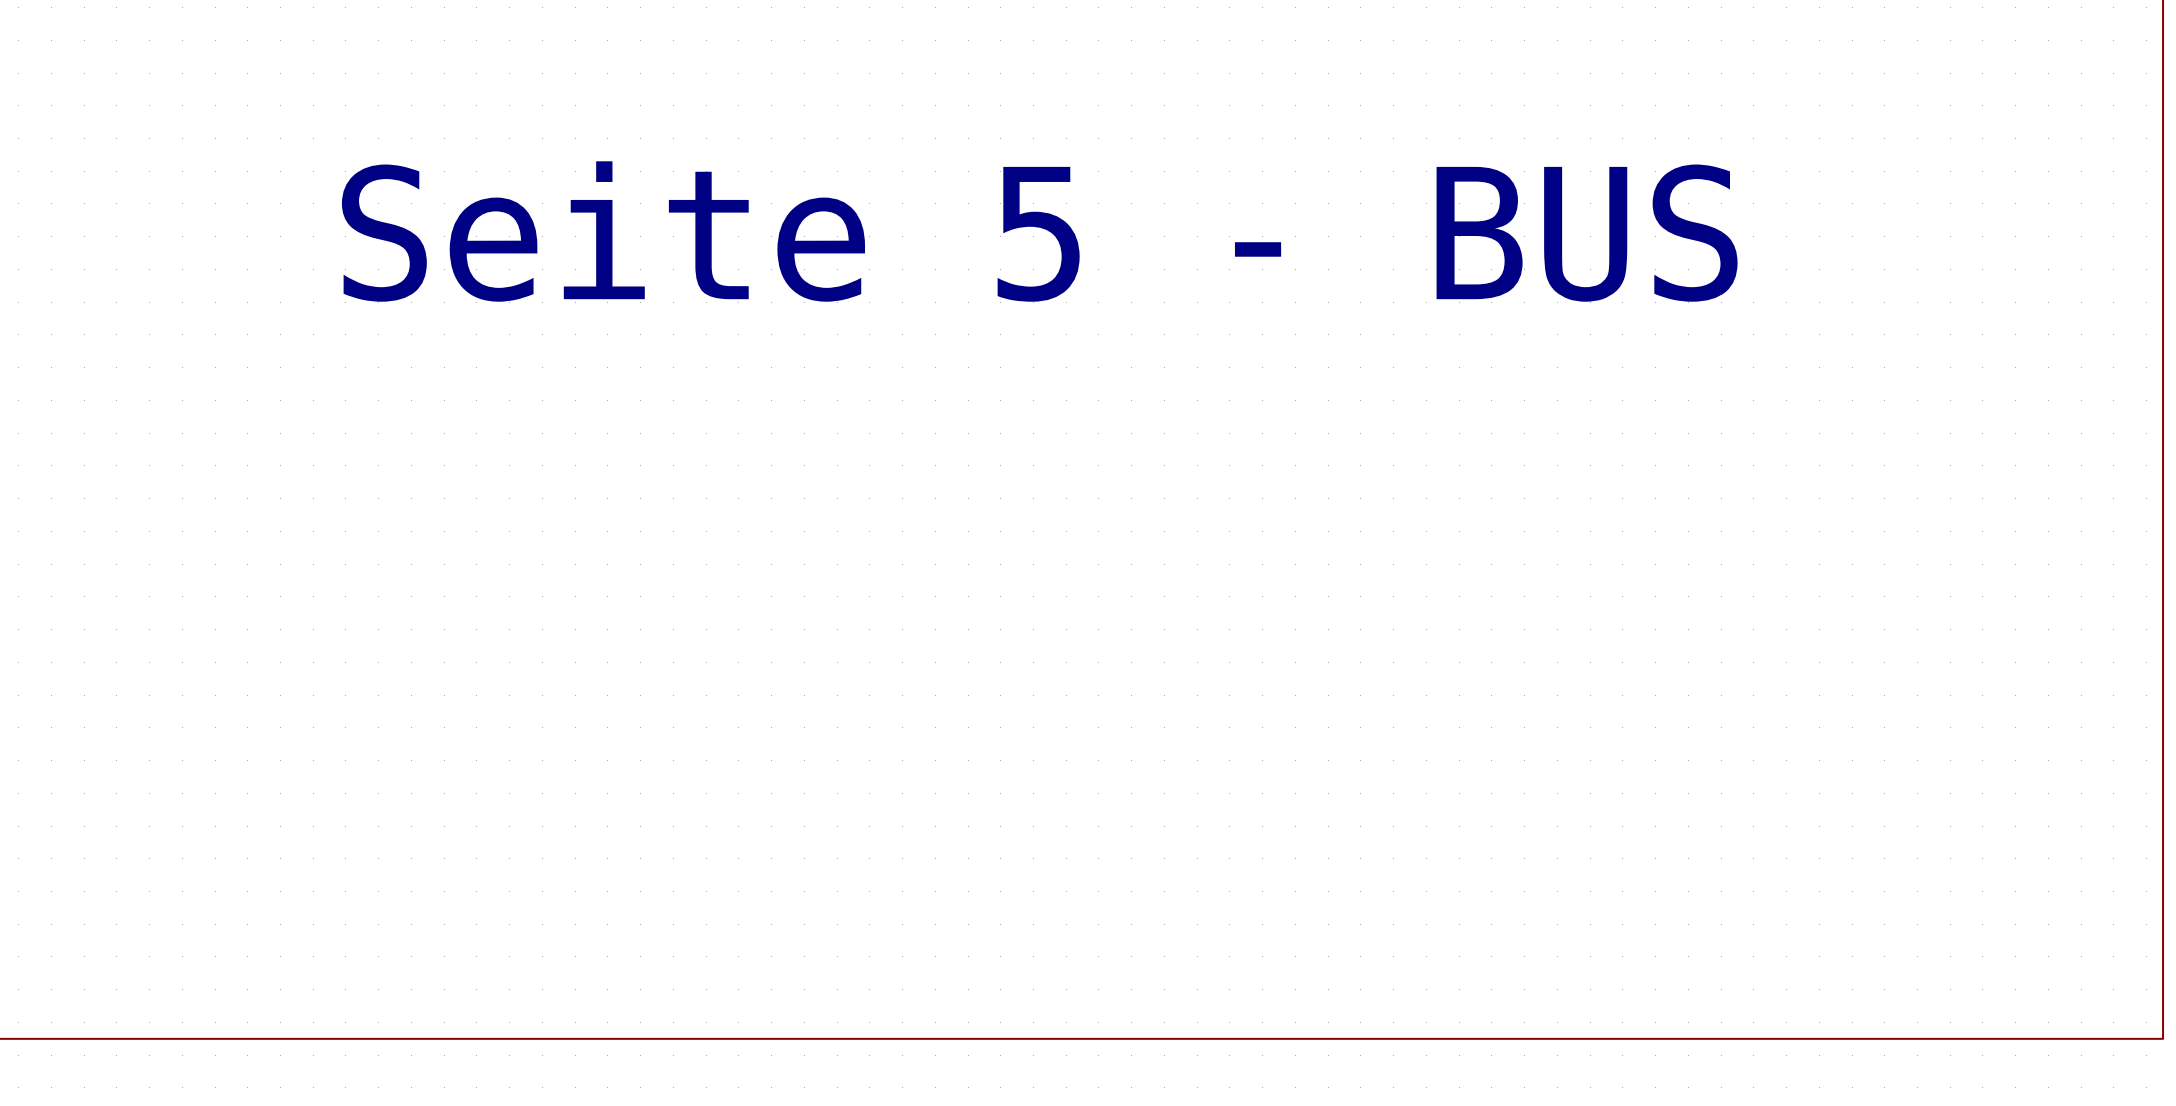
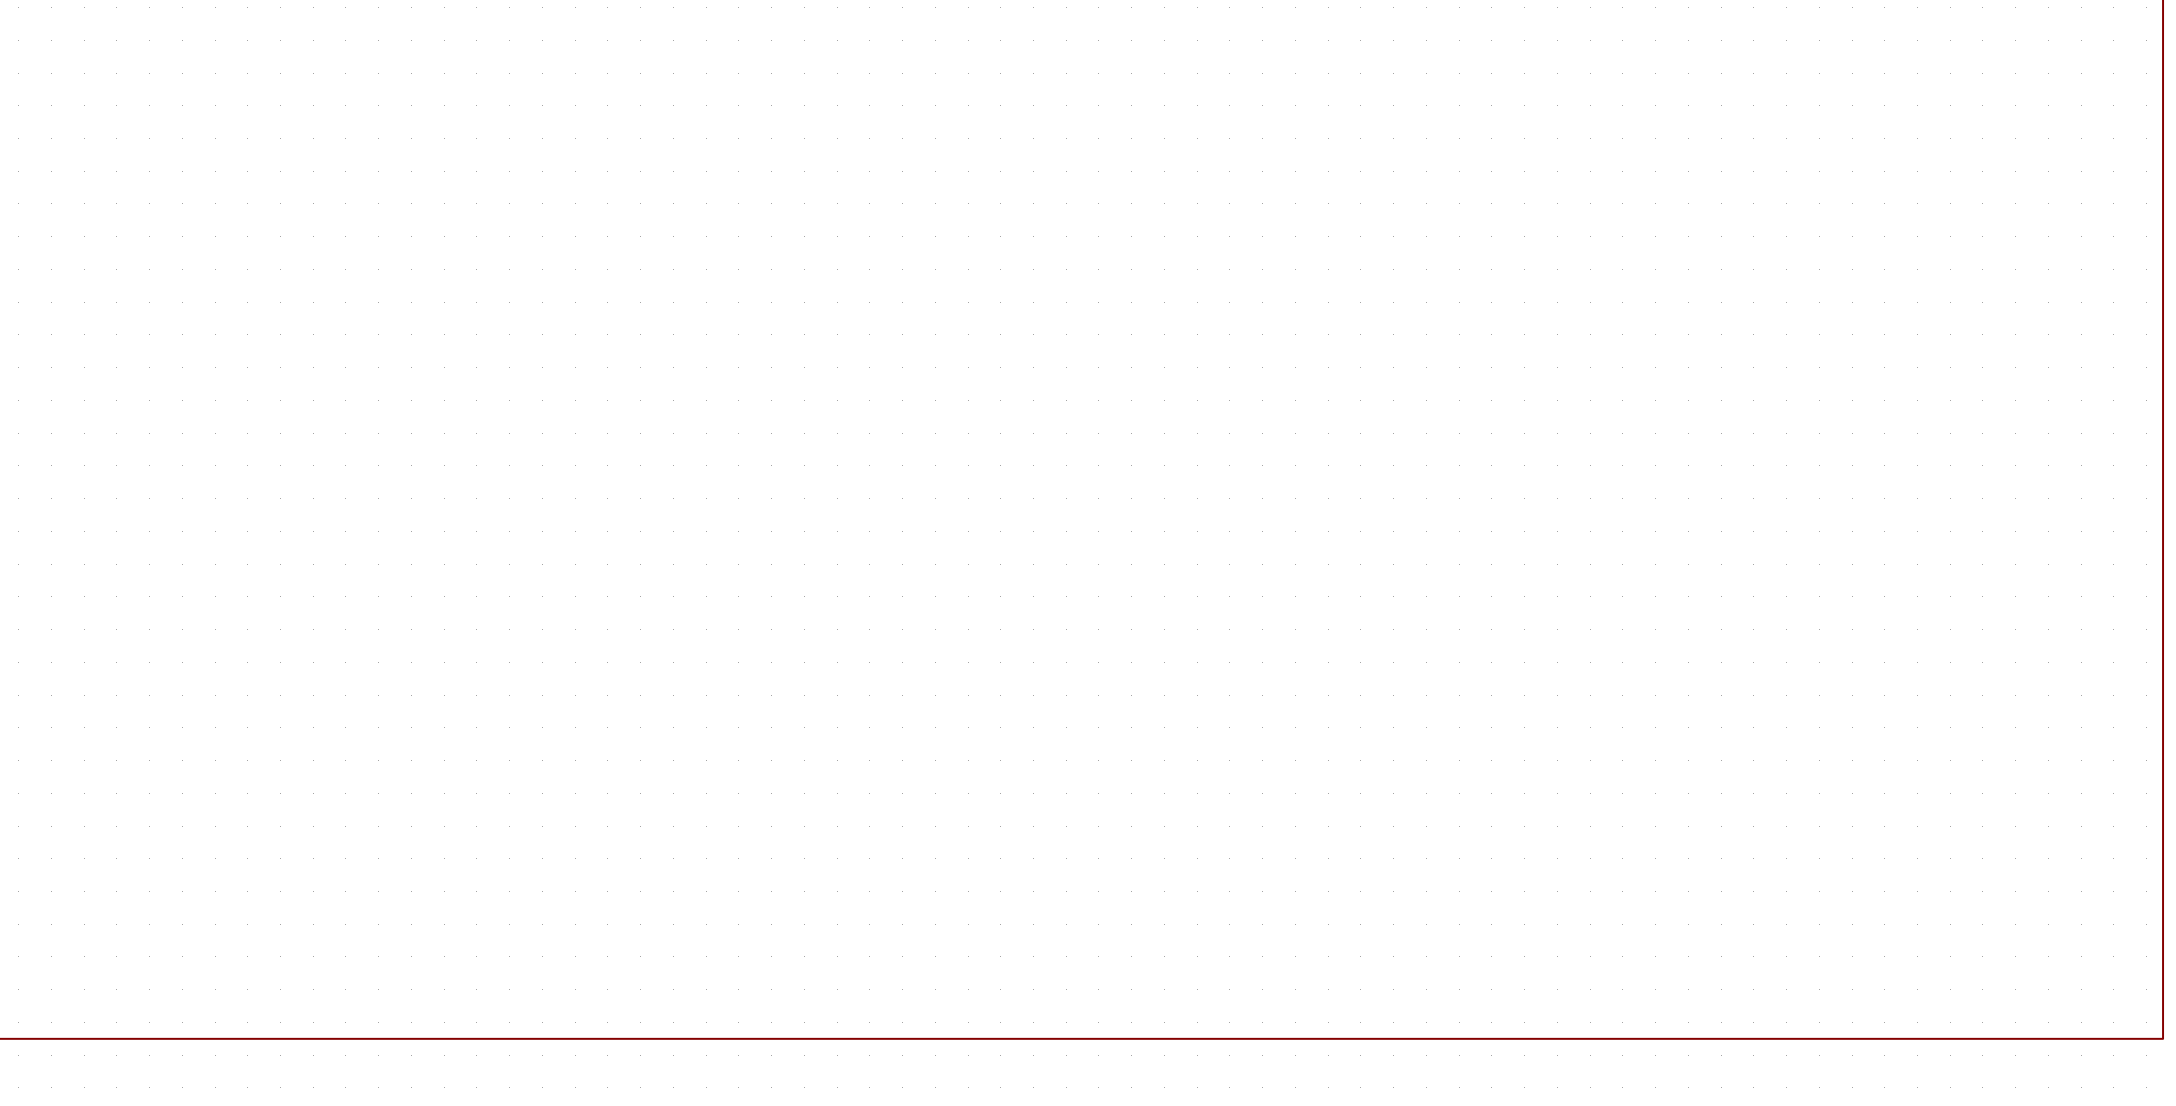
text: Seite 5 - BUS (1039, 231) -> none

